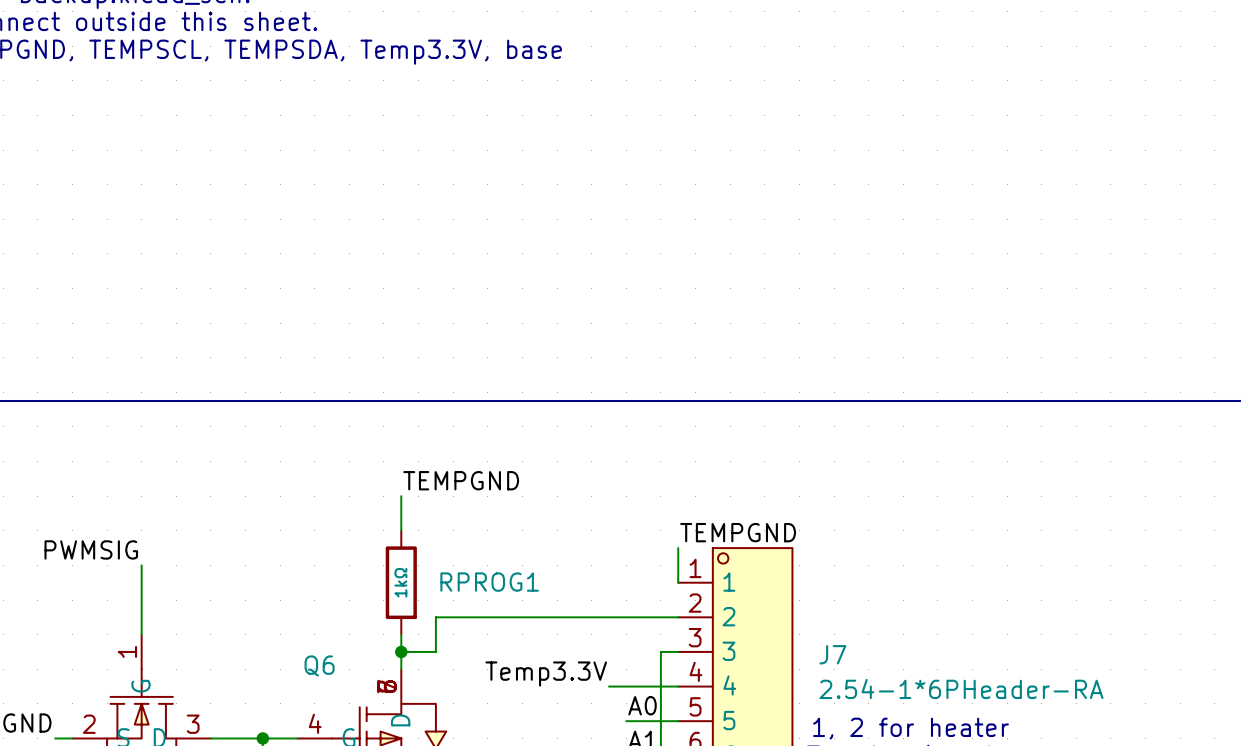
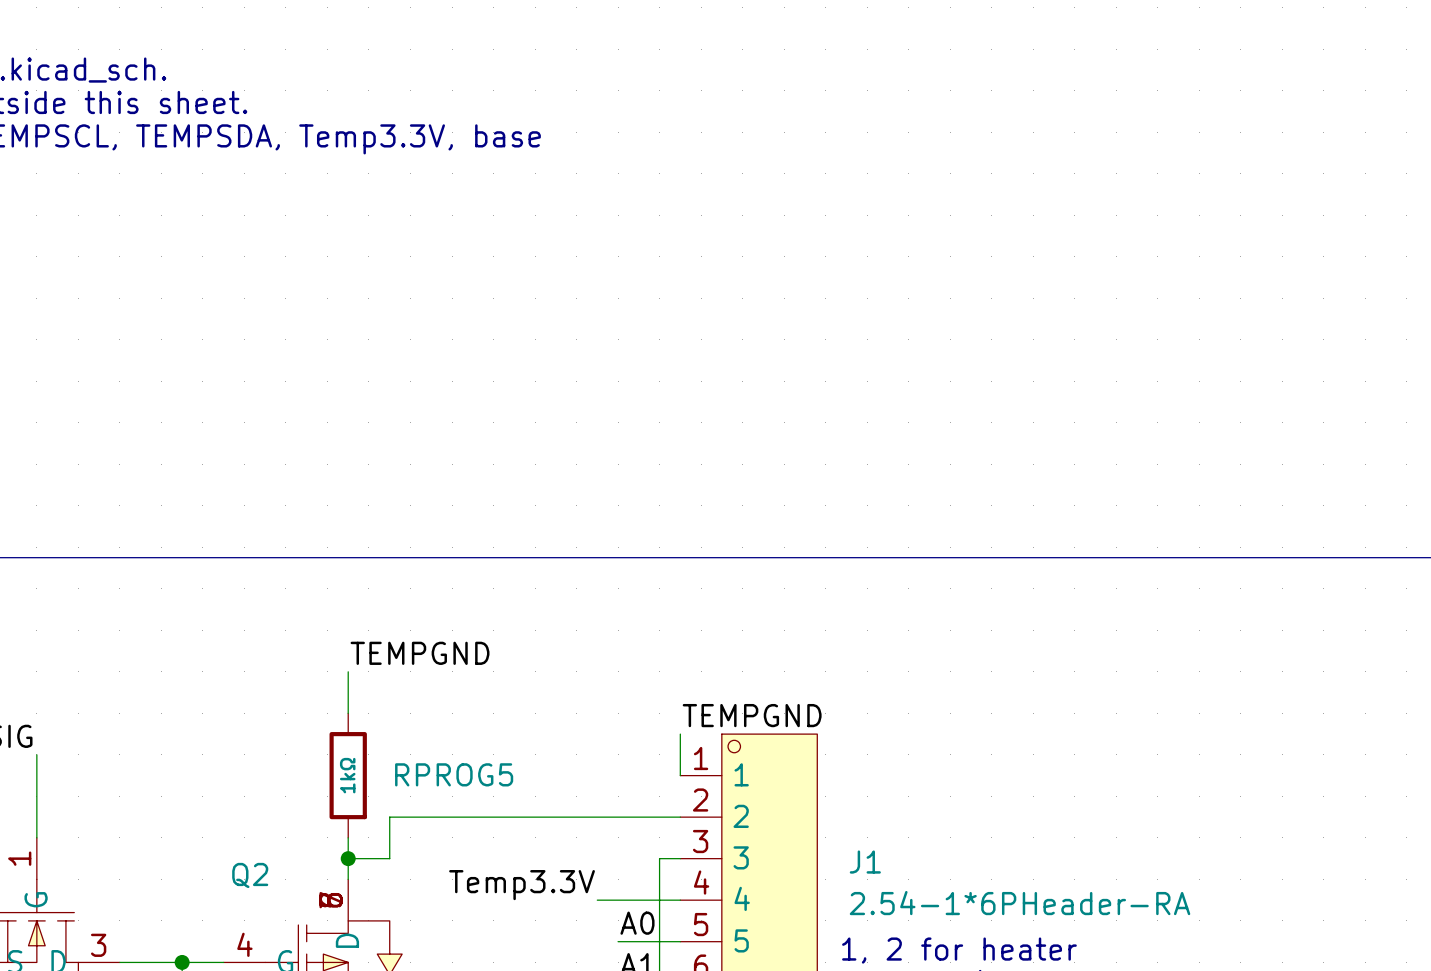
RPROG1 name: RPROG1 (489, 582) -> RPROG5 (454, 774)
J7 name: J7 (832, 654) -> J1 (865, 862)
Q6 name: Q6 (319, 665) -> Q2 (250, 875)

